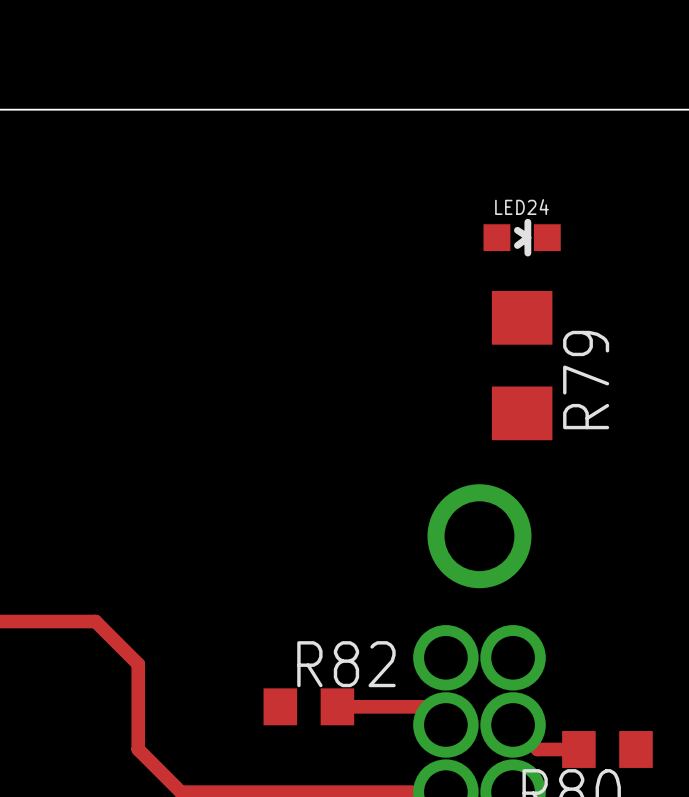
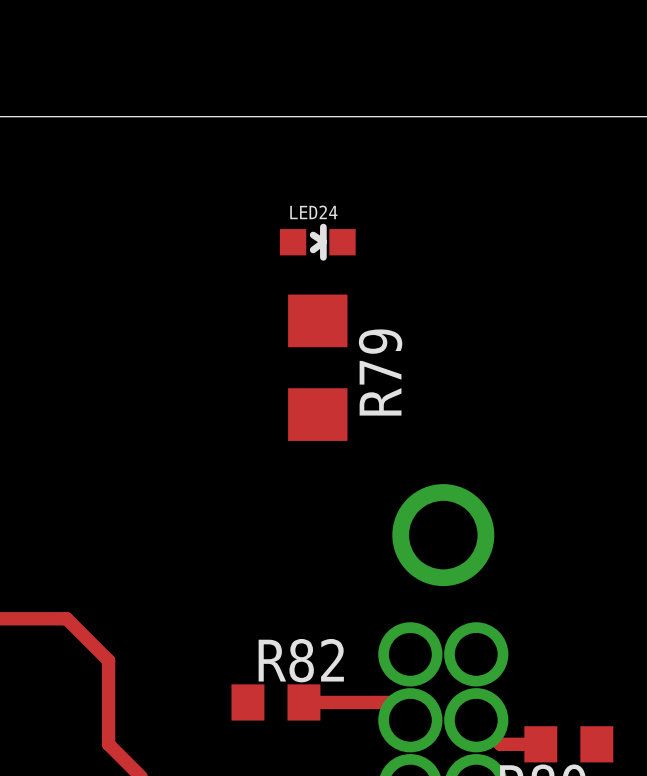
LED24 position: (522, 237) -> (317, 242)
R79 position: (522, 365) -> (317, 367)

